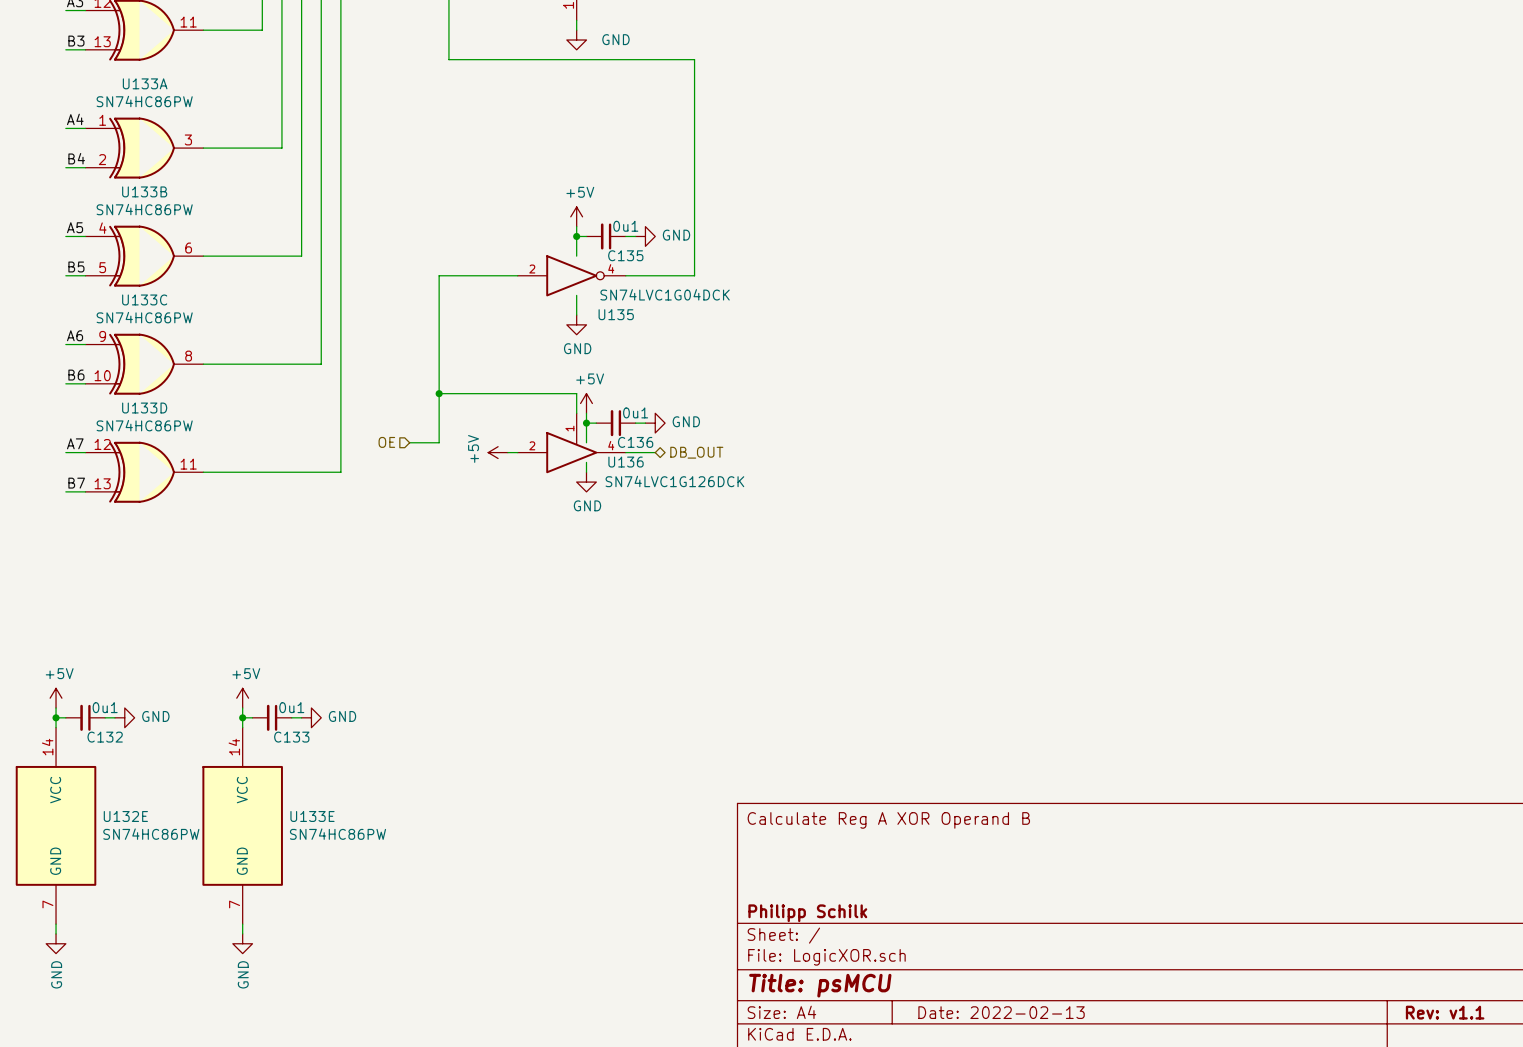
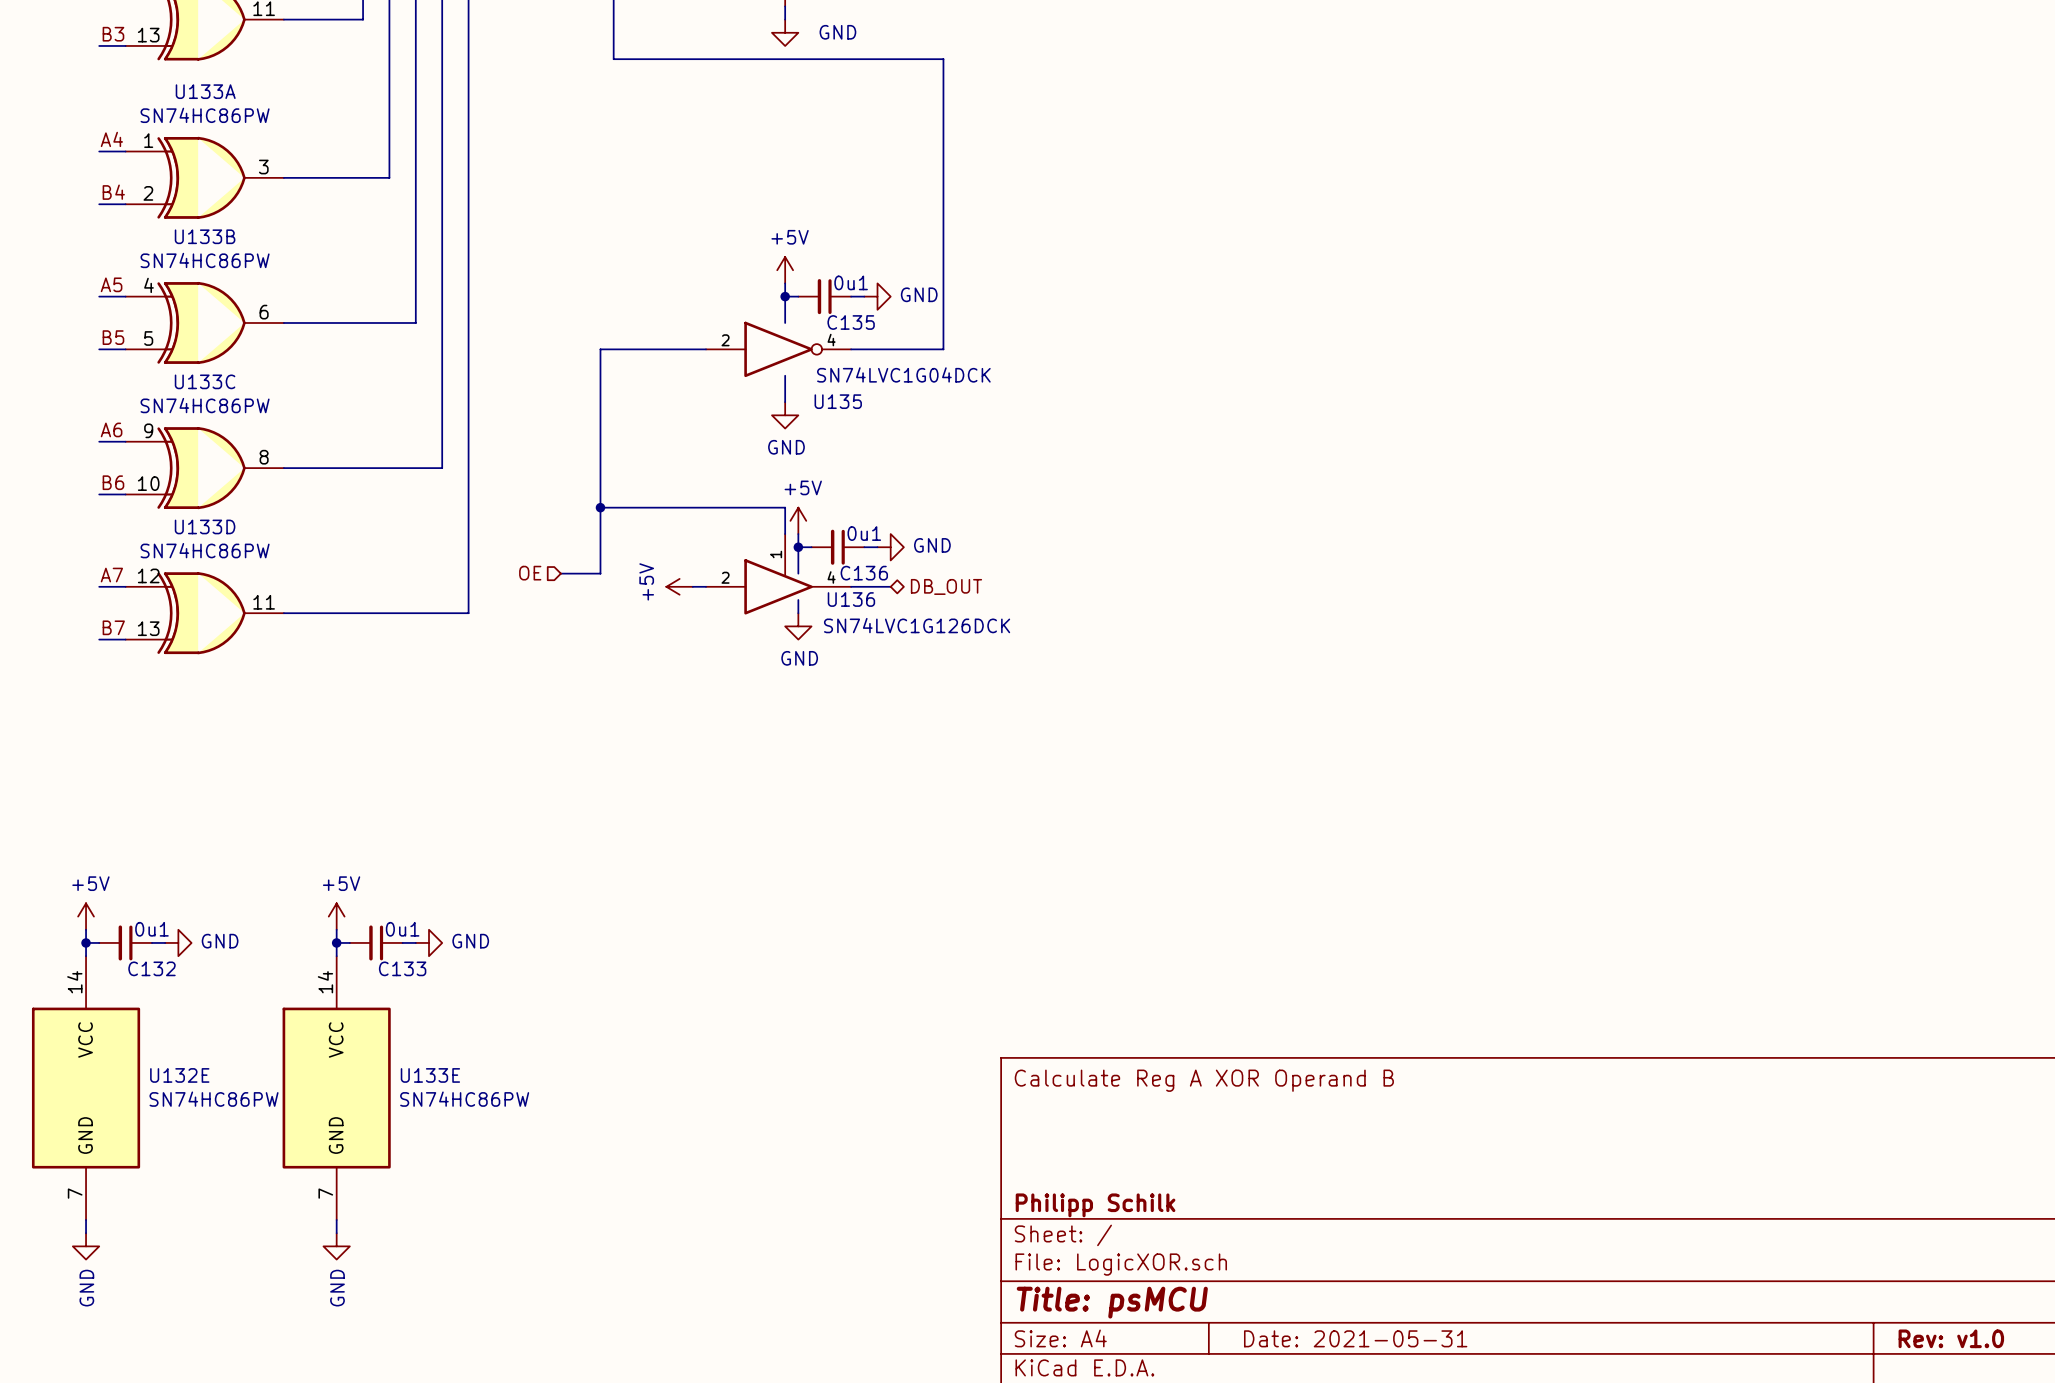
title block: Date: 2022-02-13 (1001, 1012) -> Date: 2021-05-31 (1355, 1338)
title block: Rev: v1.1 (1445, 1012) -> Rev: v1.0 (1951, 1338)

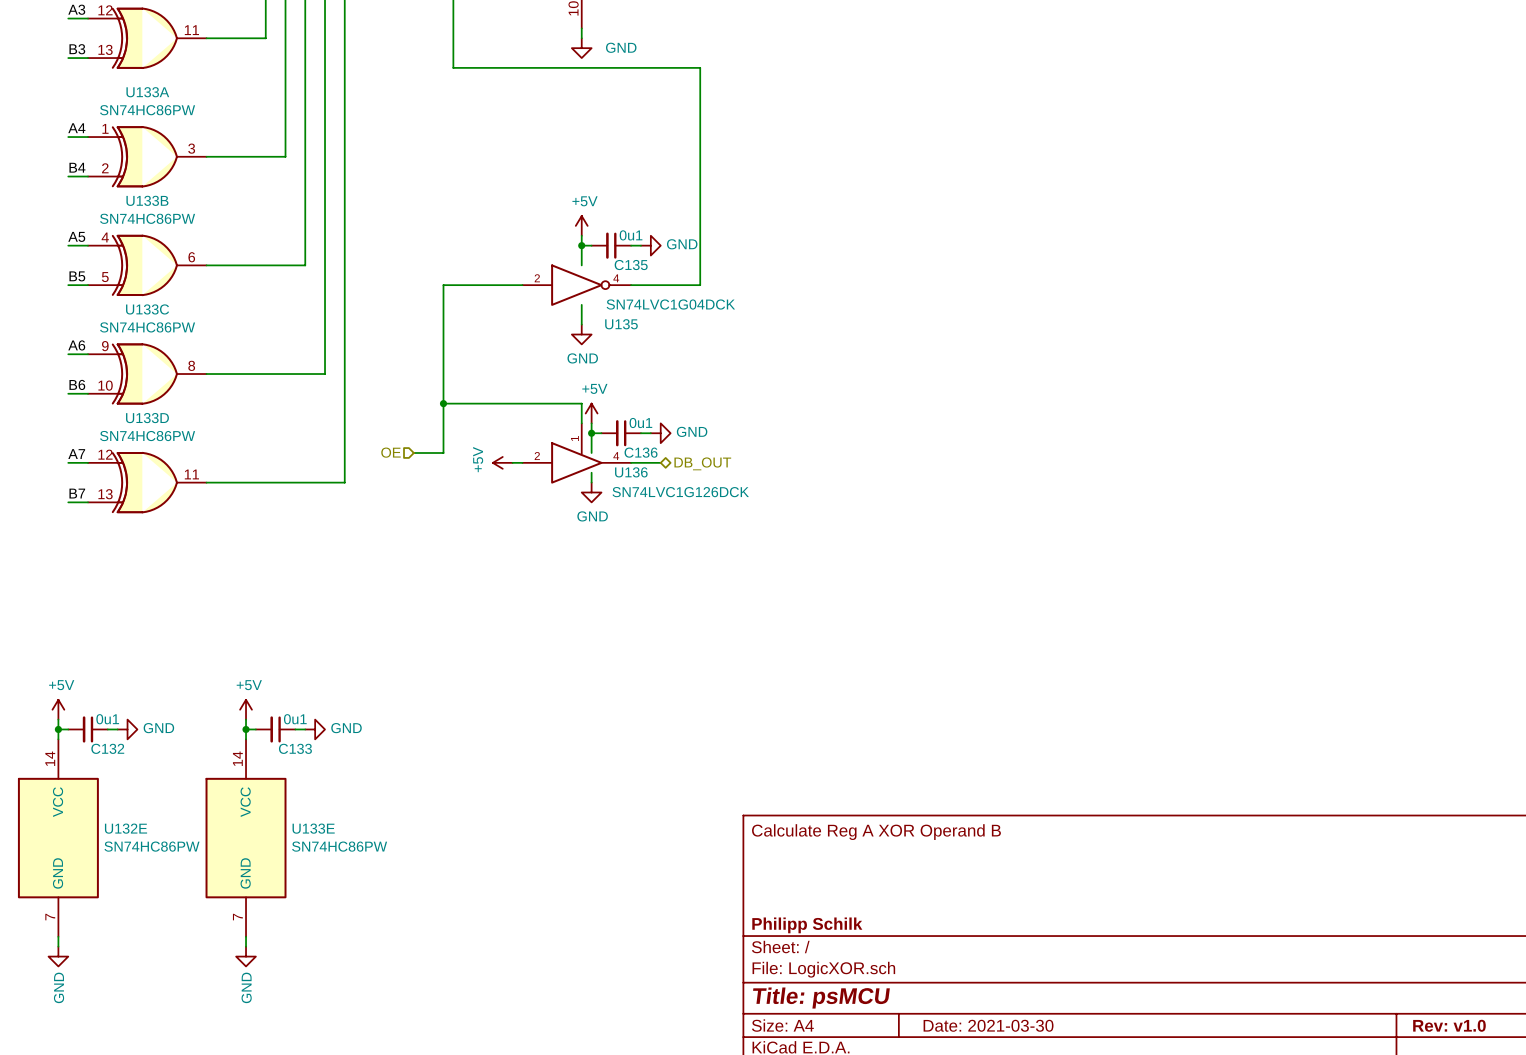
title block: Date: 2021-05-31 (1355, 1338) -> Date: 2021-03-30 (988, 1025)

